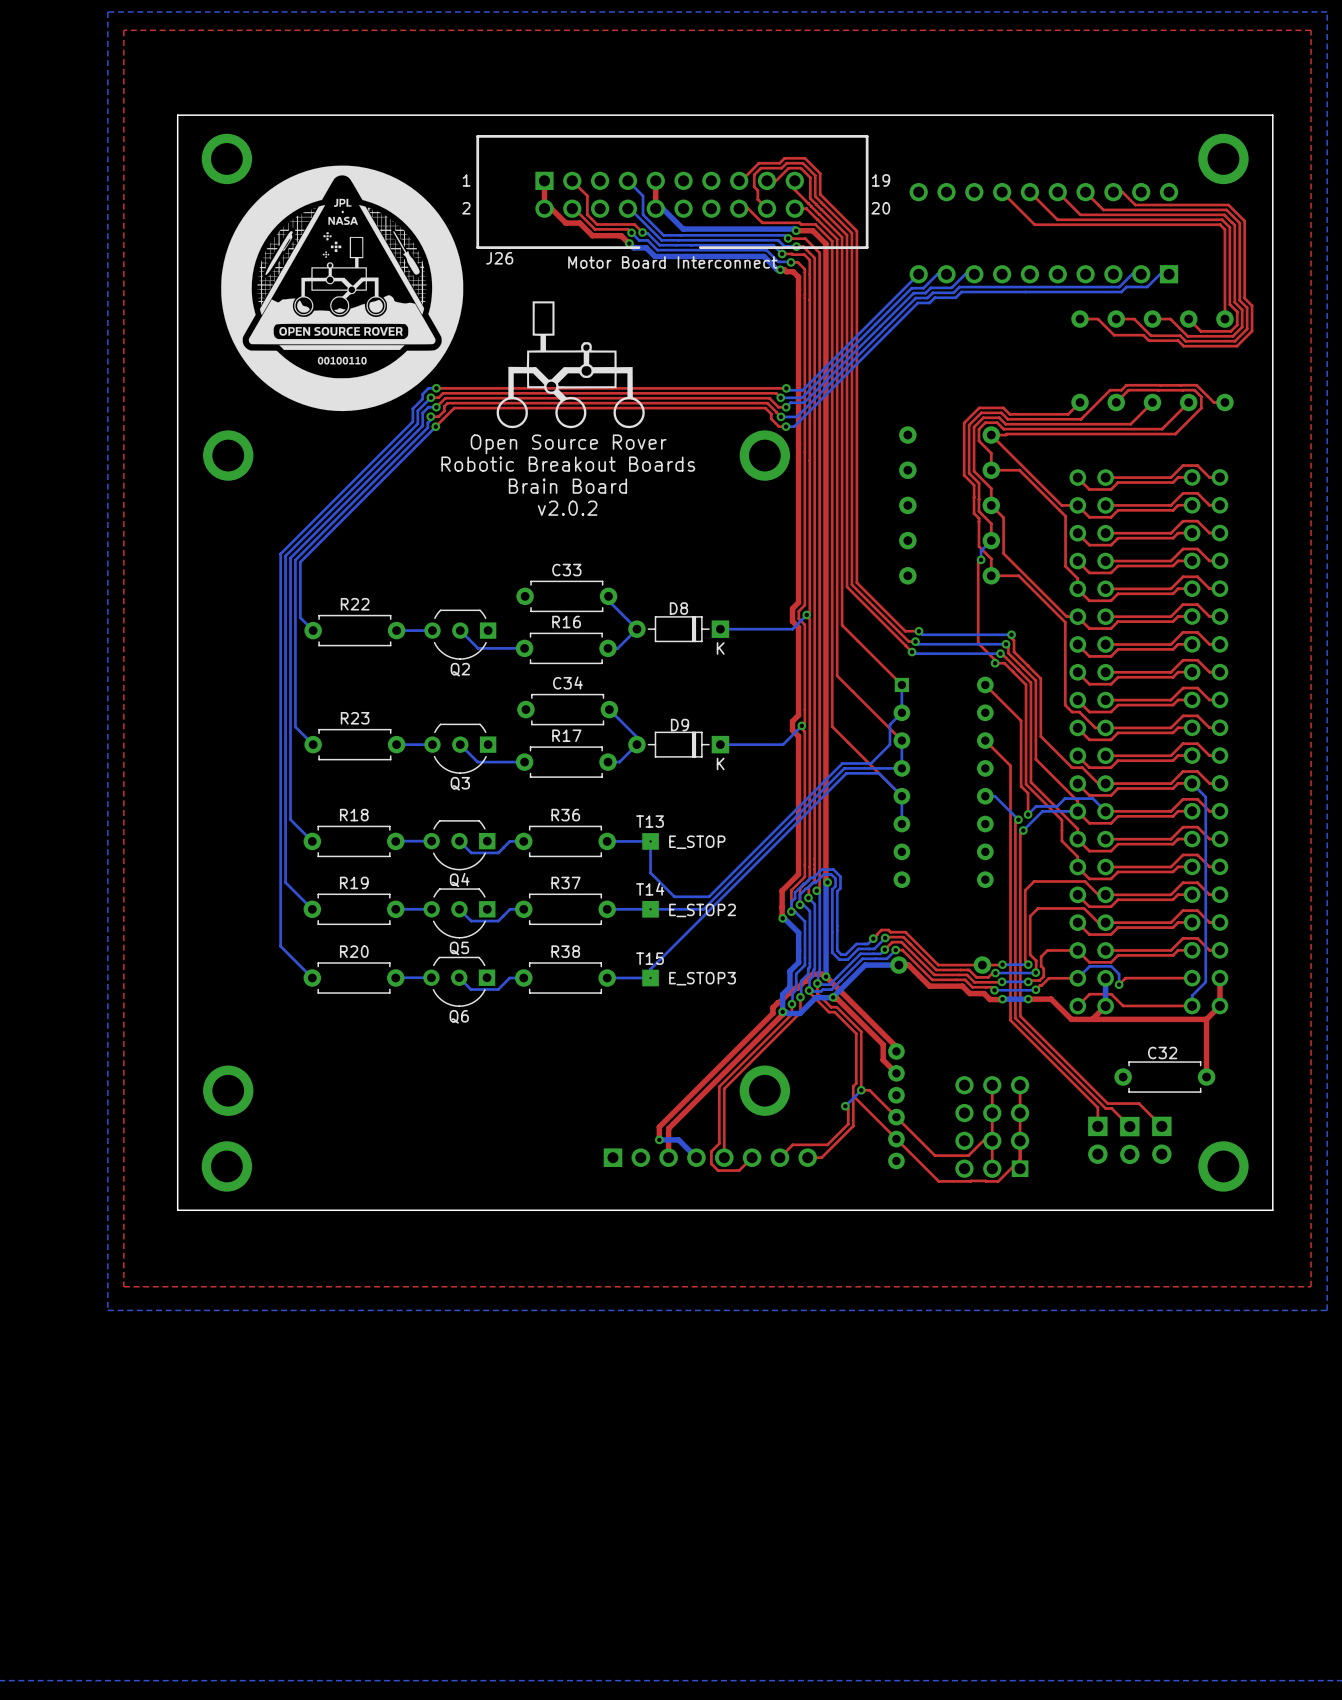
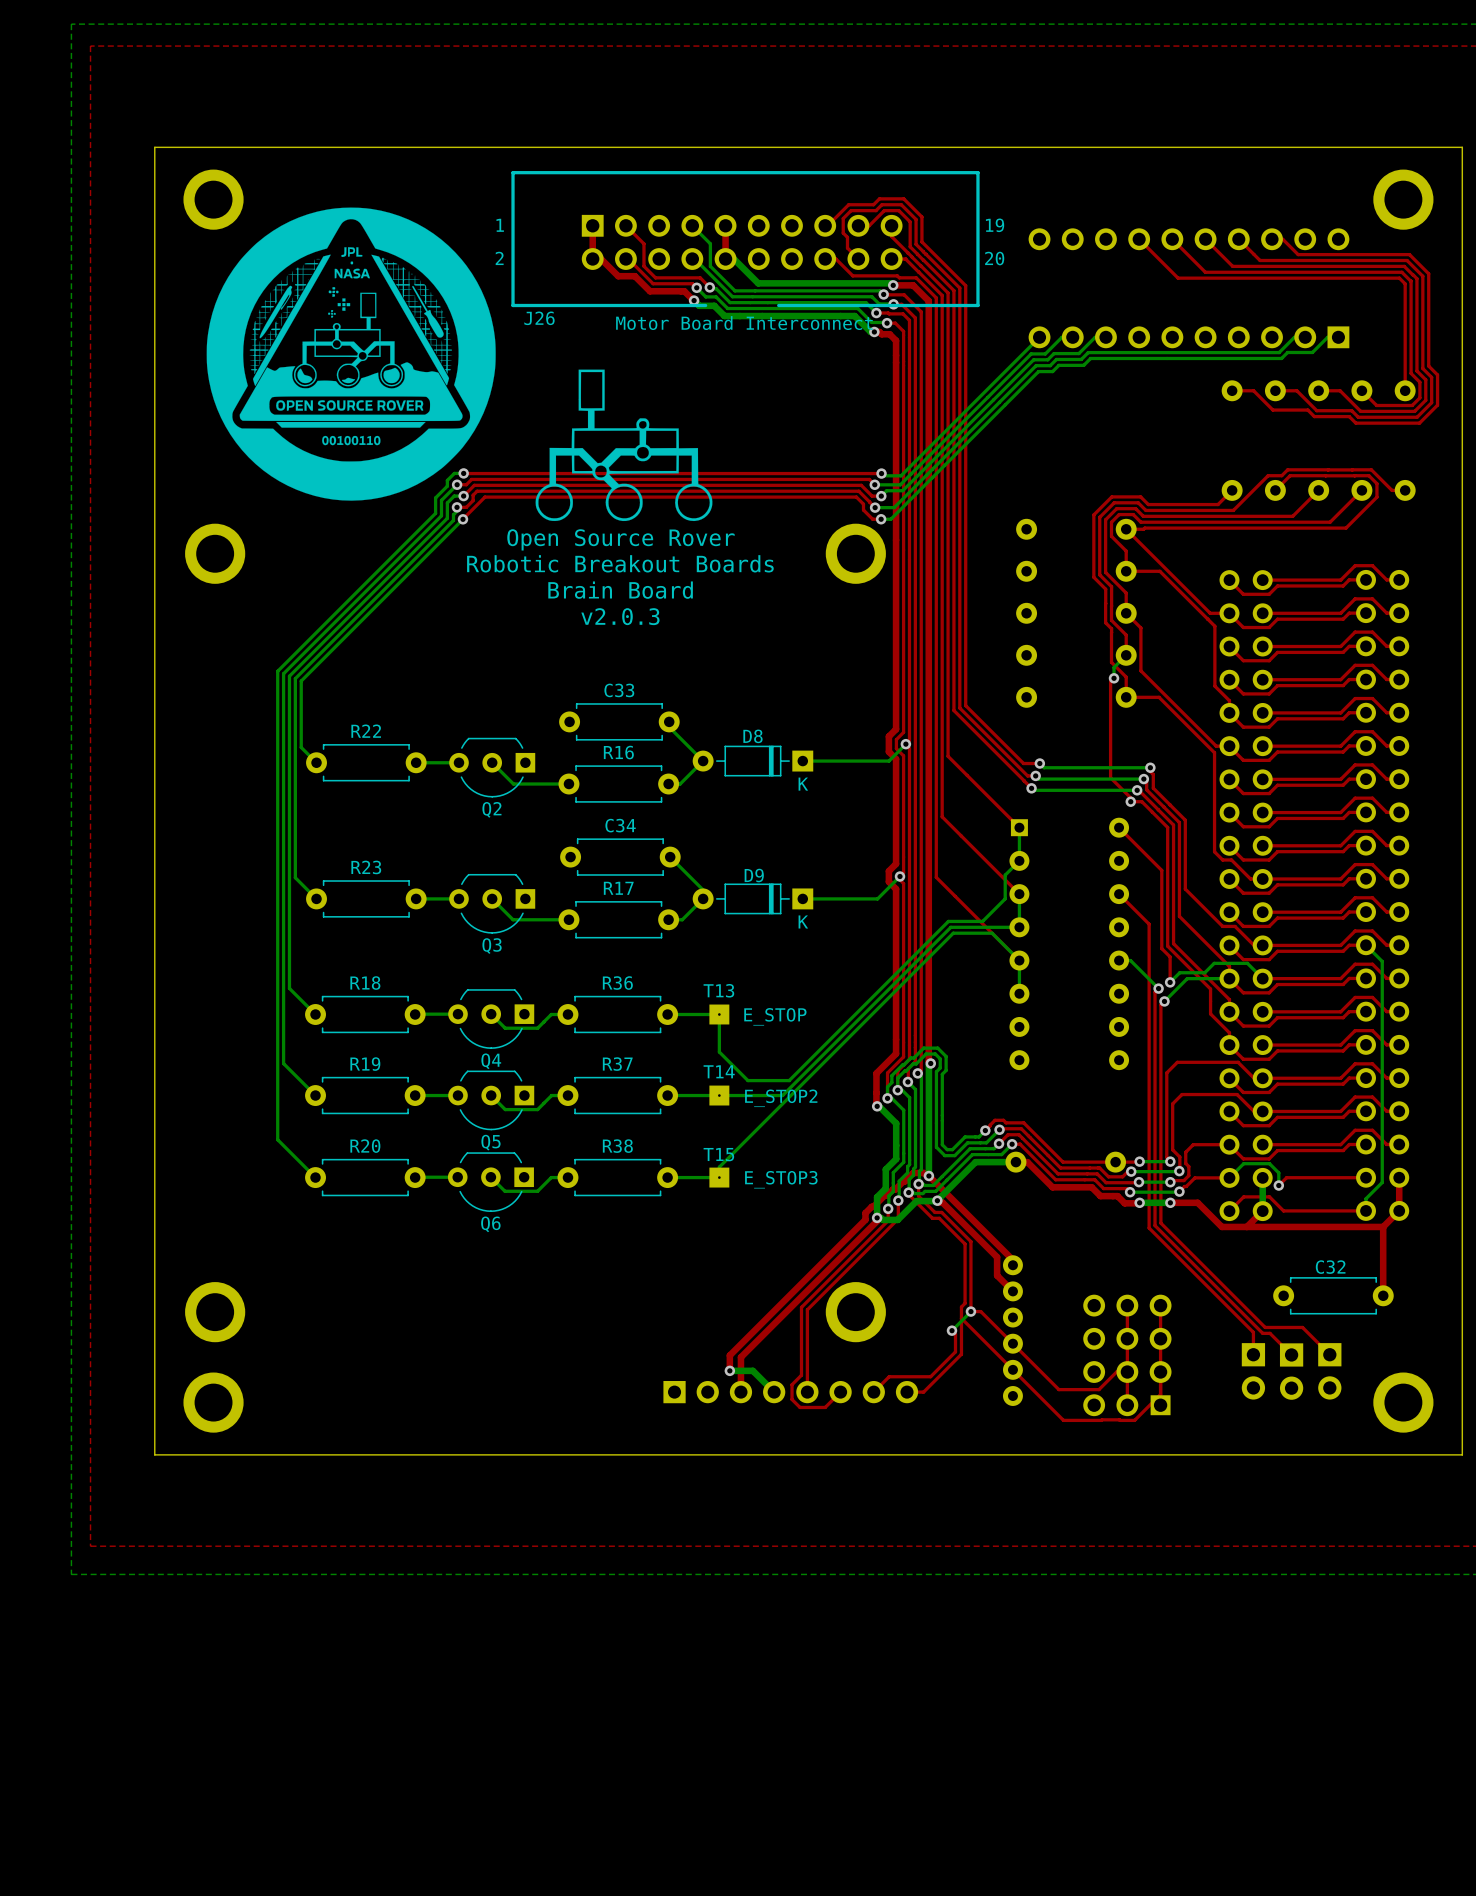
text: v2.0.2 (567, 508) -> v2.0.3 (620, 616)

